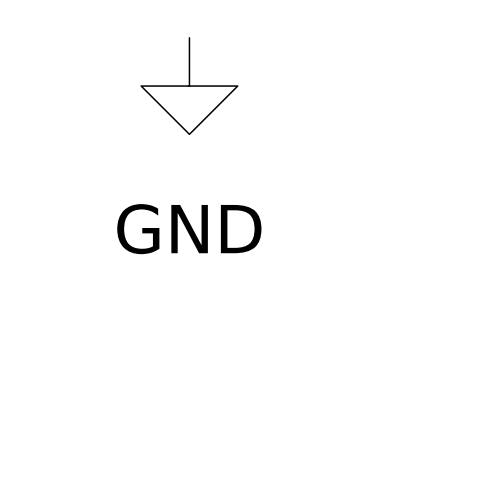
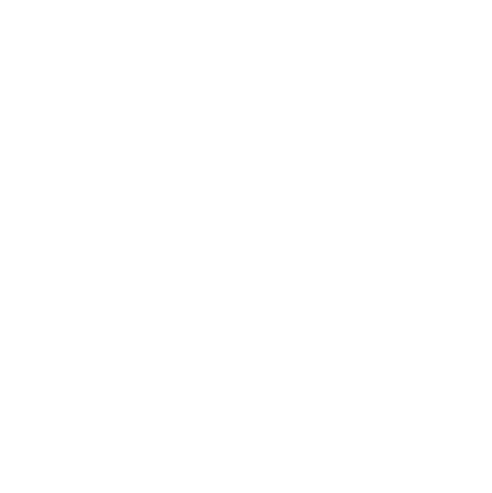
power symbol: GND (189, 86) -> none

